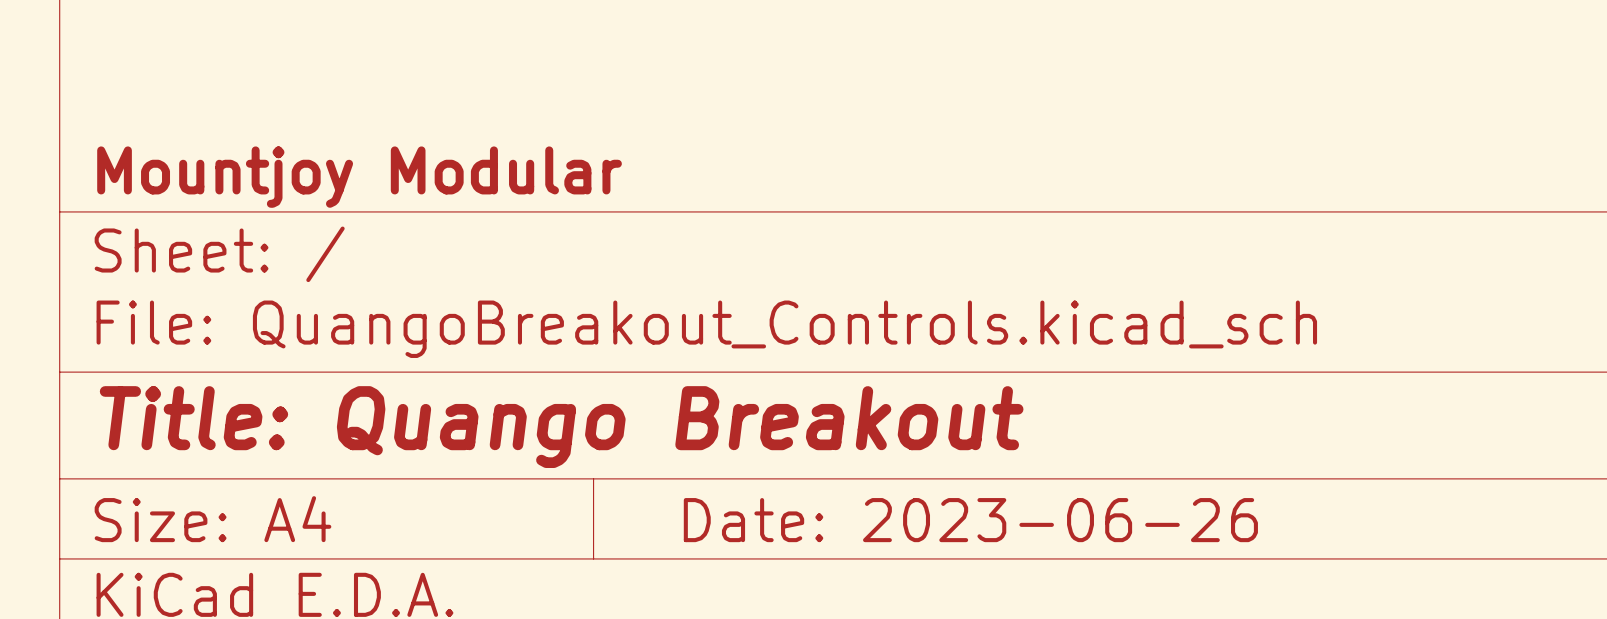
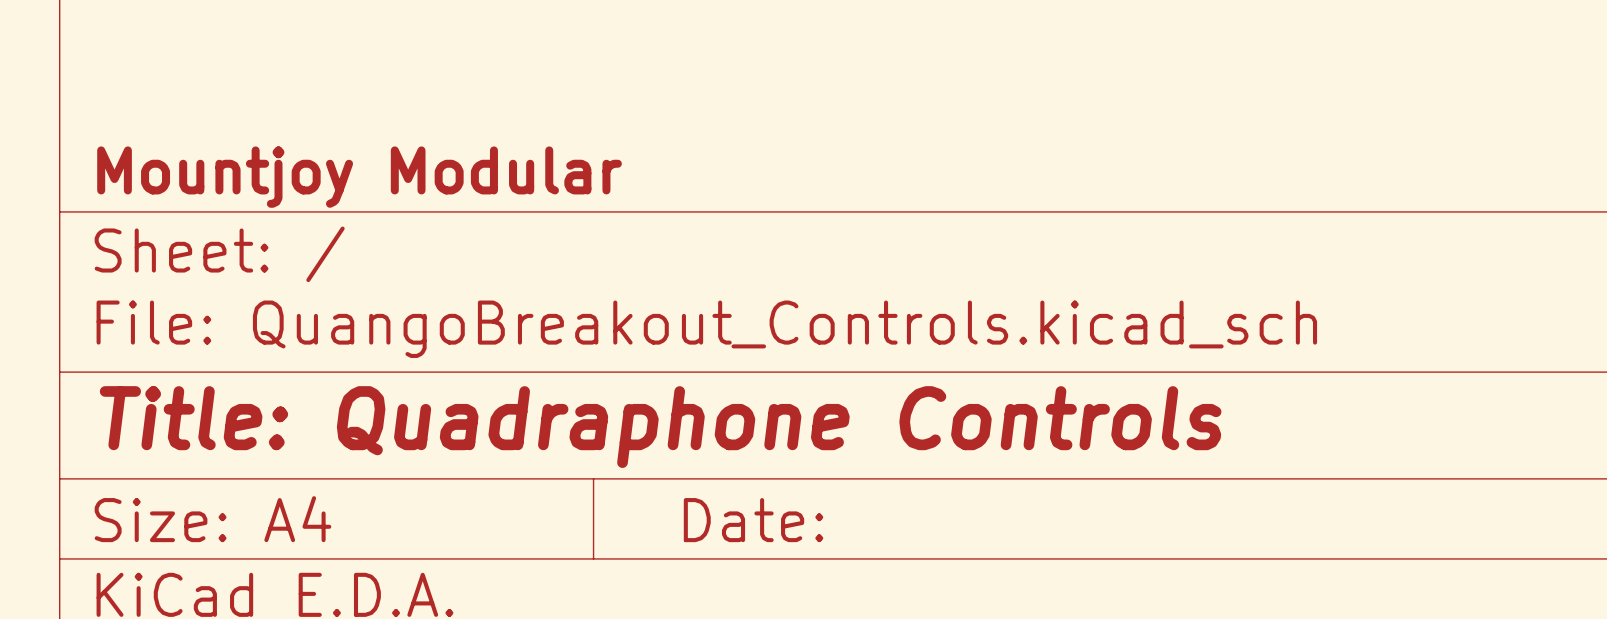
title block: Title: Quango Breakout (561, 427) -> Title: Quadraphone Controls (660, 427)
title block: Date: 2023-06-26 (970, 520) -> Date: (753, 520)

